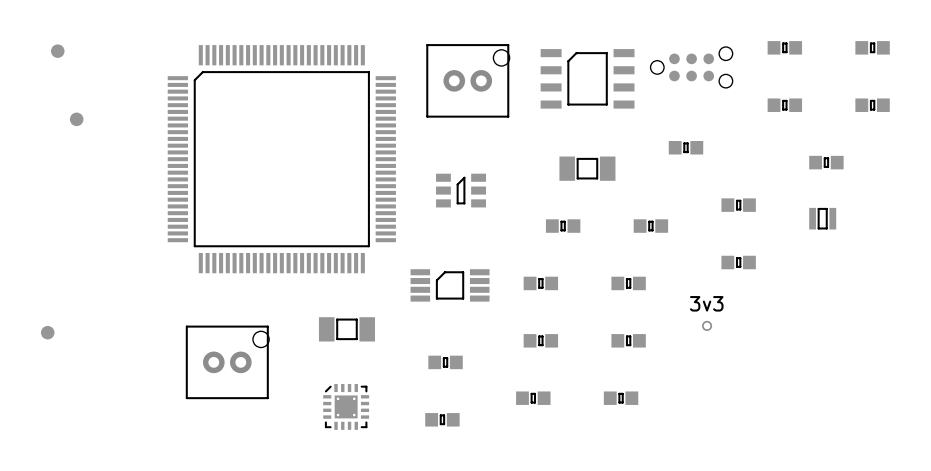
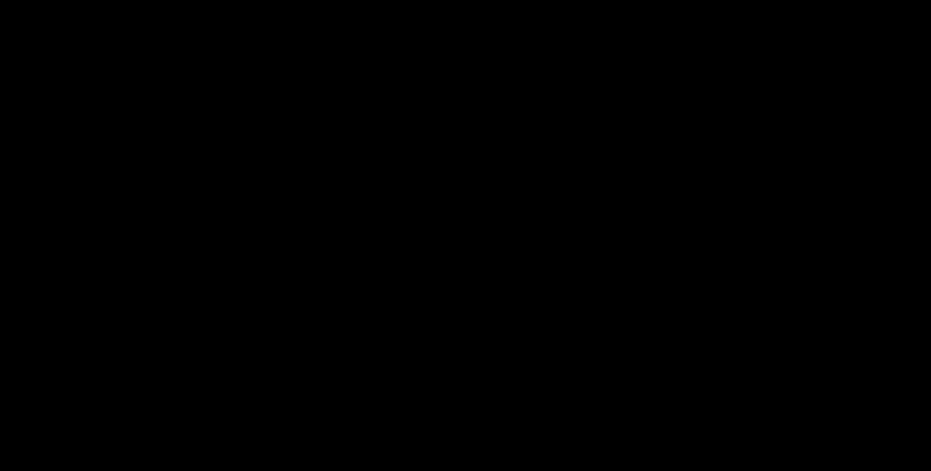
part: (784, 47) -> none
part: (872, 47) -> none
part: (57, 51) -> none
part: (691, 67) -> none
part: (587, 78) -> none
part: (467, 80) -> none
part: (784, 105) -> none
part: (872, 105) -> none
part: (76, 119) -> none
part: (686, 147) -> none
part: (281, 159) -> none
part: (826, 162) -> none
part: (587, 168) -> none
part: (461, 190) -> none
part: (738, 205) -> none
part: (822, 218) -> none
part: (563, 226) -> none
part: (650, 226) -> none
part: (738, 262) -> none
part: (540, 283) -> none
part: (628, 283) -> none
part: (450, 285) -> none
part: 3v3 (707, 325) -> none
part: (346, 329) -> none
part: (47, 332) -> none
part: (540, 340) -> none
part: (628, 340) -> none
part: (227, 362) -> none
part: (445, 362) -> none
part: (533, 398) -> none
part: (621, 398) -> none
part: (346, 406) -> none
part: (442, 419) -> none

